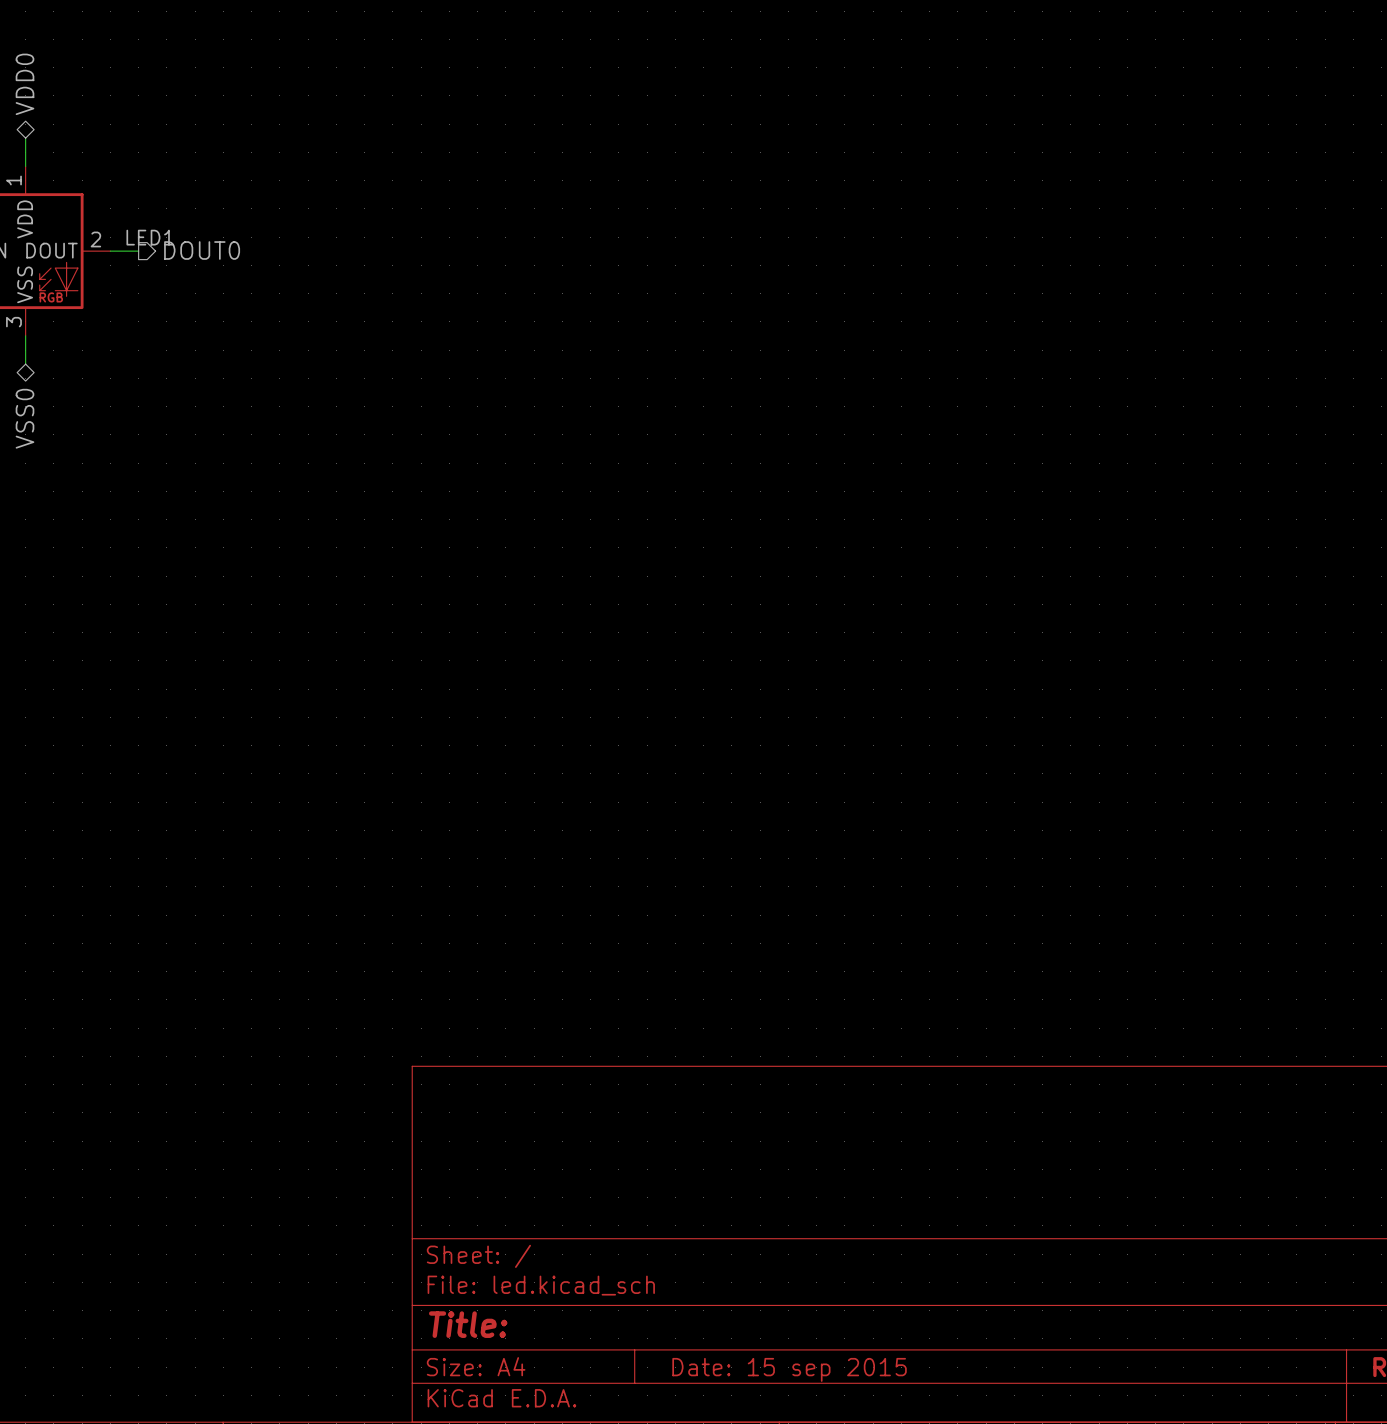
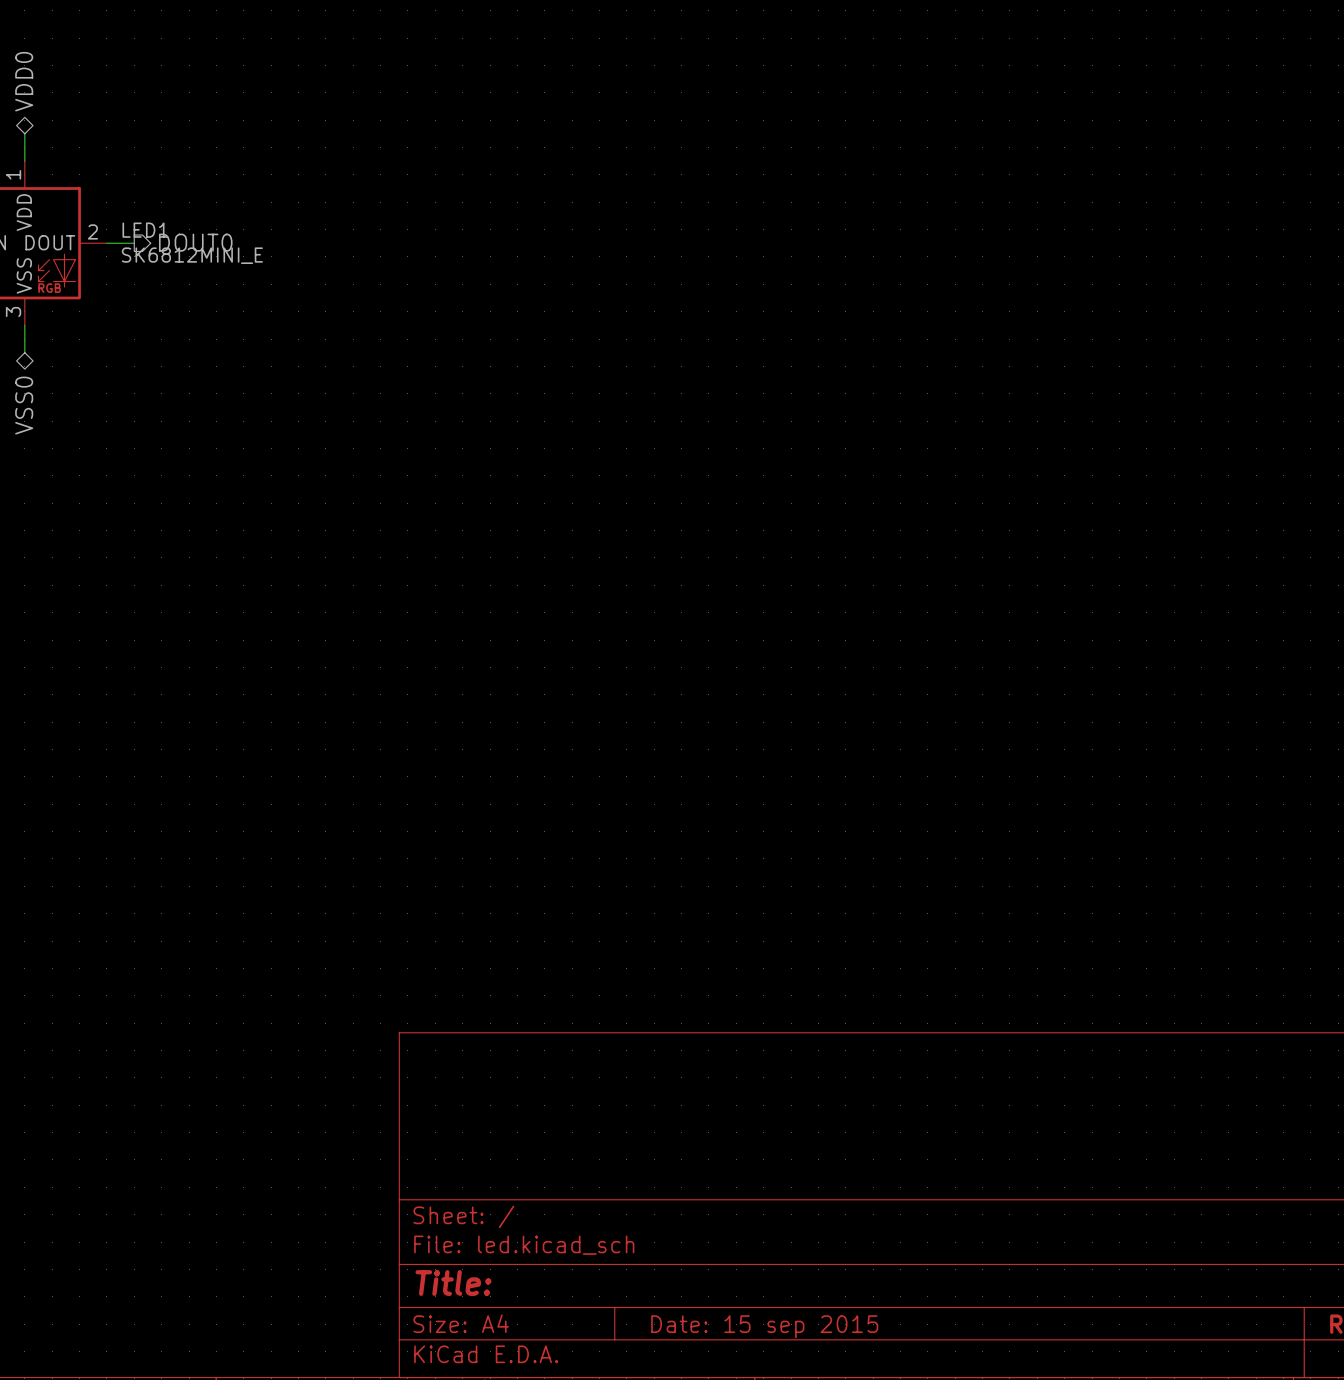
LED1 value: none -> SK6812MINI_E (192, 255)

